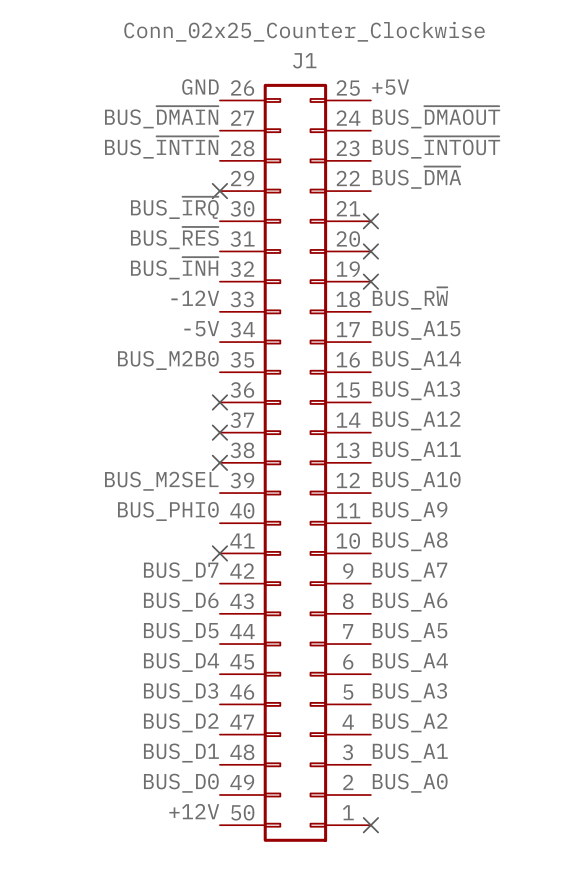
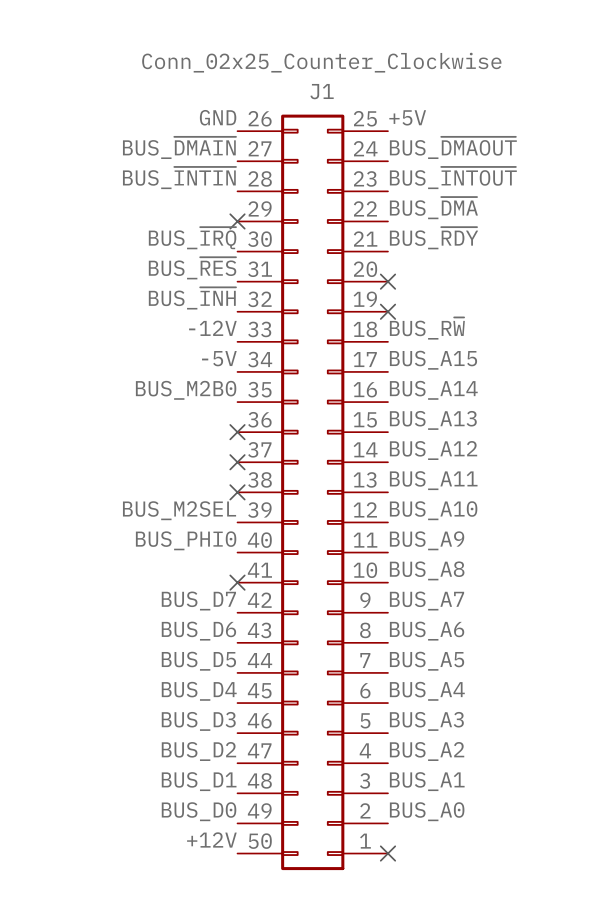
label: none -> BUS_~{RDY} (434, 238)
no-connect mark: (370, 221) -> none

